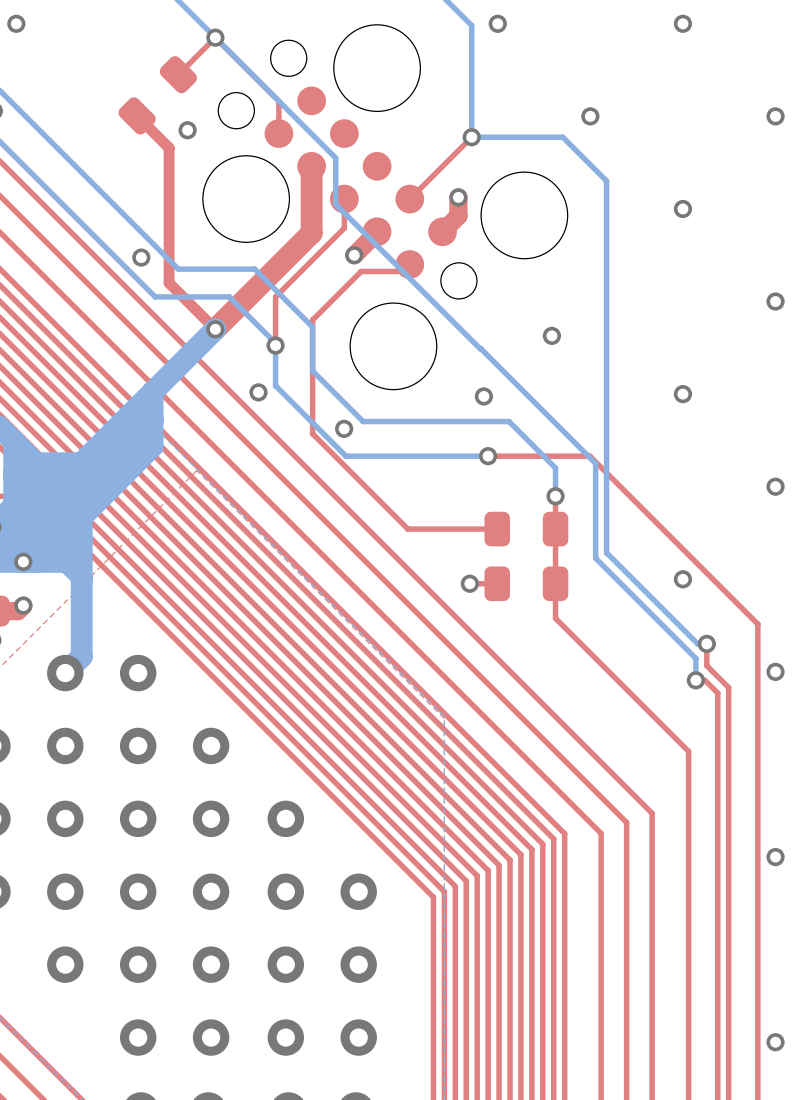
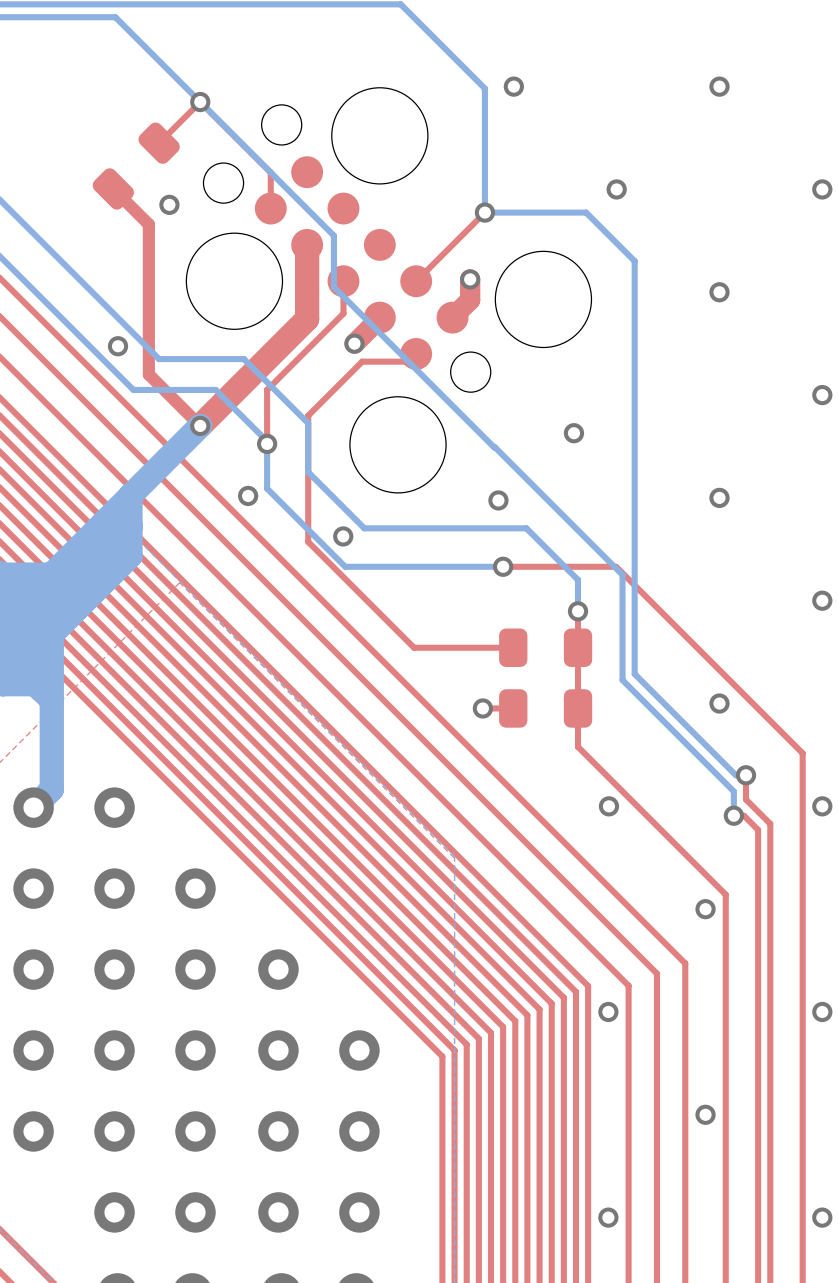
via: none -> (608, 806)
via: none -> (705, 909)
via: none -> (608, 1011)
via: none -> (705, 1114)
via: none -> (608, 1217)

